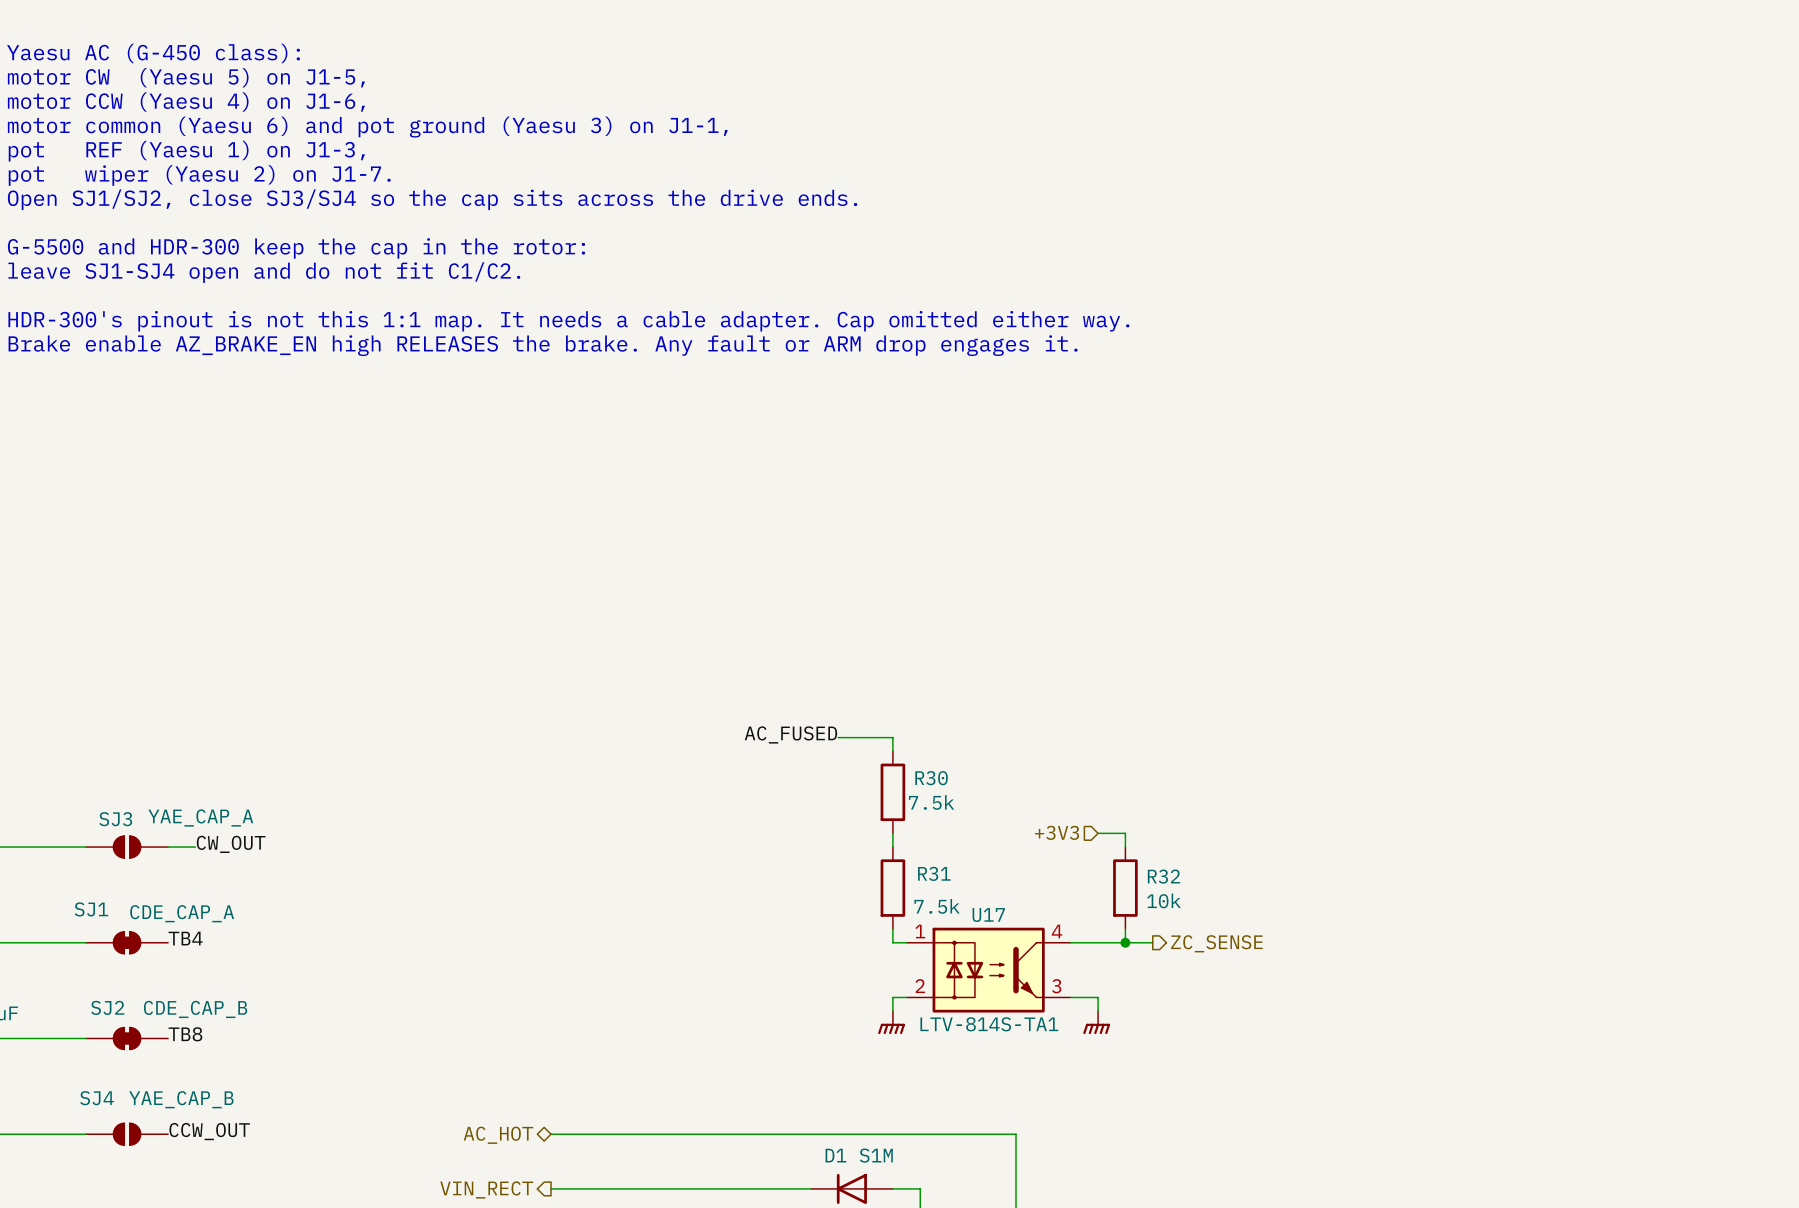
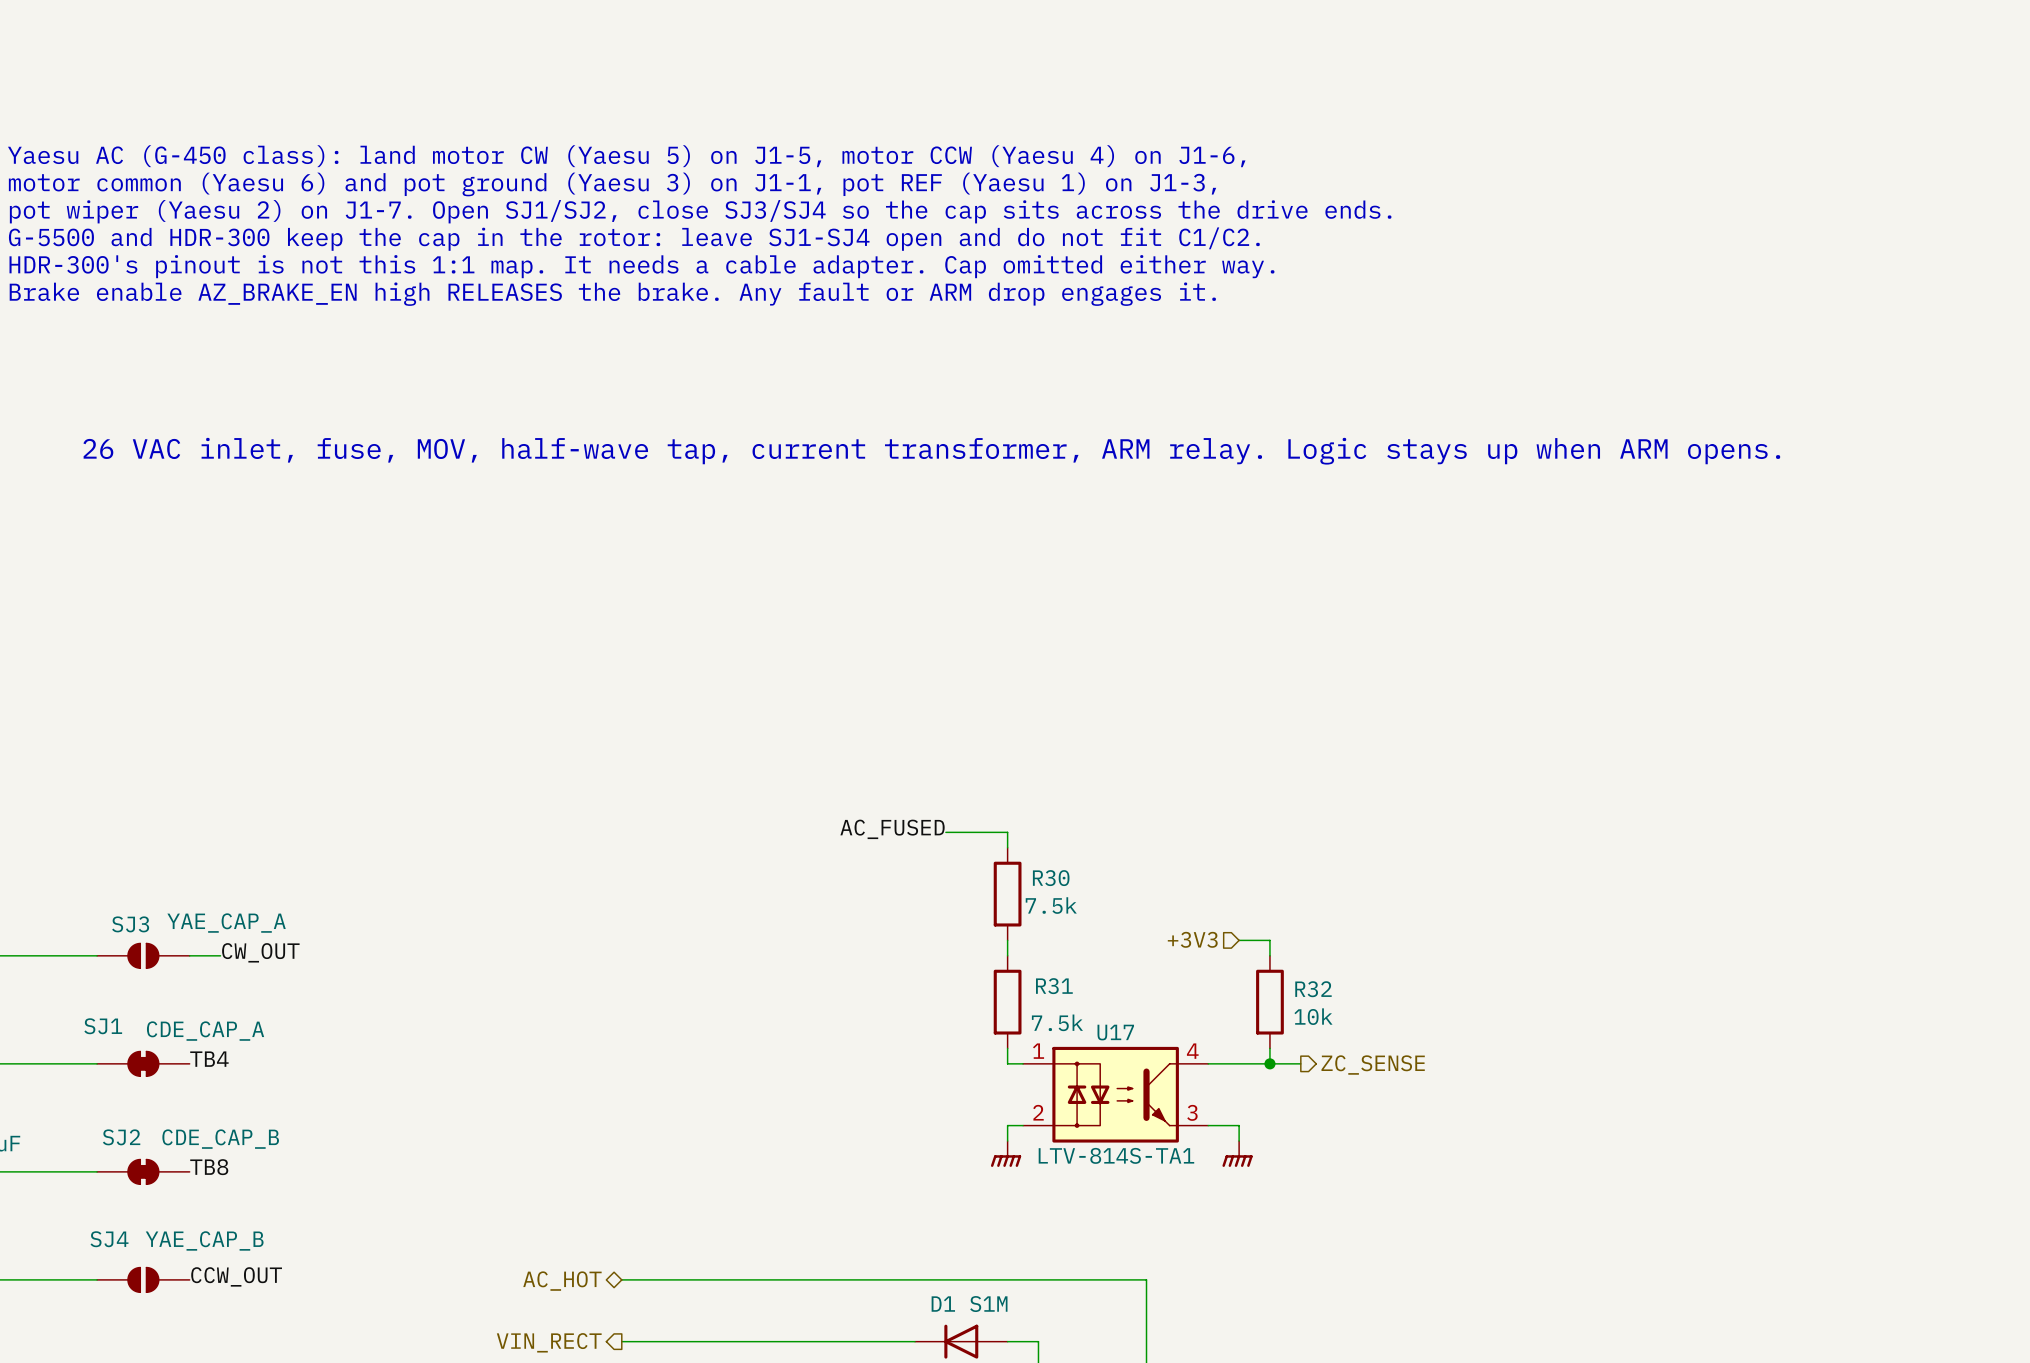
text: Yaesu AC (G-450 class): (153, 53) -> none
text: motor CW (Yaesu 5) on J1-5, (186, 77) -> none
text: motor CCW (Yaesu 4) on J1-6, (186, 102) -> none
text: motor common (Yaesu 6) and pot ground (Yaesu 3) on J1-1, (367, 127) -> none
text: none -> Yaesu AC (G-450 class): land motor CW (Yaesu 5) on J1-5, motor CCW (Yaesu 4) on J1-6, (626, 156)
text: pot REF (Yaesu 1) on J1-3, (186, 151) -> none
text: none -> motor common (Yaesu 6) and pot ground (Yaesu 3) on J1-1, pot REF (Yaesu 1) on J1-3, (612, 184)
text: pot wiper (Yaesu 2) on J1-7. (199, 175) -> none
text: Open SJ1/SJ2, close SJ3/SJ4 so the cap sits across the drive ends. (432, 199) -> pot wiper (Yaesu 2) on J1-7. Open SJ1/SJ2, close SJ3/SJ4 so the cap sits across the drive ends. (700, 211)
text: none -> G-5500 and HDR-300 keep the cap in the rotor: leave SJ1-SJ4 open and do not fit C1/C2. (634, 239)
text: G-5500 and HDR-300 keep the cap in the rotor: (296, 248) -> none
text: leave SJ1-SJ4 open and do not fit C1/C2. (264, 272) -> none
text position: HDR-300's pinout is not this 1:1 map. It needs a cable adapter. Cap omitted either way. (568, 321) -> HDR-300's pinout is not this 1:1 map. It needs a cable adapter. Cap omitted either way. (641, 266)
text position: Brake enable AZ_BRAKE_EN high RELEASES the brake. Any fault or ARM drop engages it. (543, 345) -> Brake enable AZ_BRAKE_EN high RELEASES the brake. Any fault or ARM drop engages it. (612, 294)
text: none -> 26 VAC inlet, fuse, MOV, half-wave tap, current transformer, ARM relay. Logic stays up when ARM opens. (931, 451)

